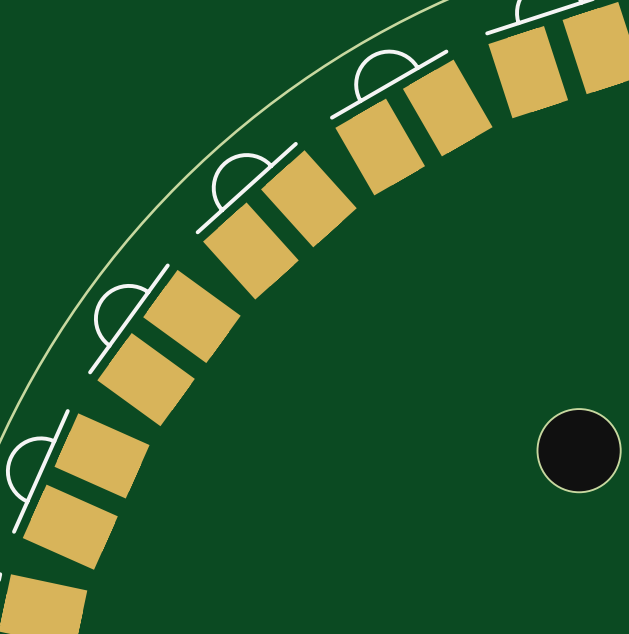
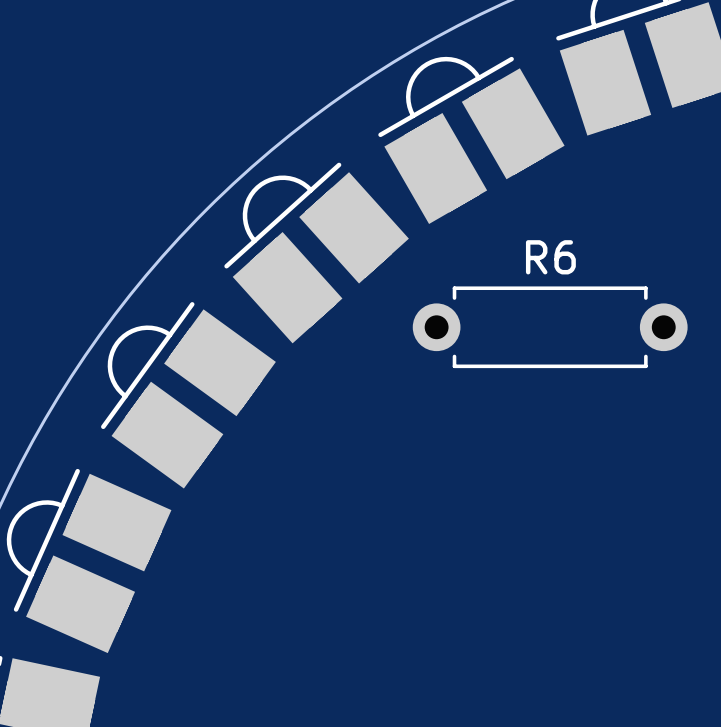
R6: none -> (550, 327)
part: (579, 450) -> none

